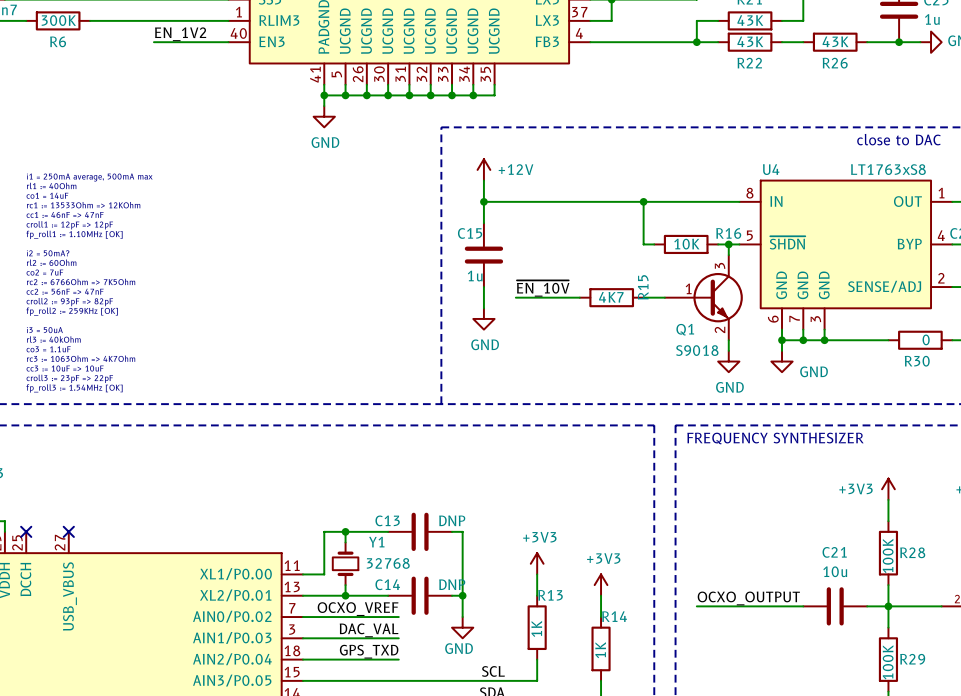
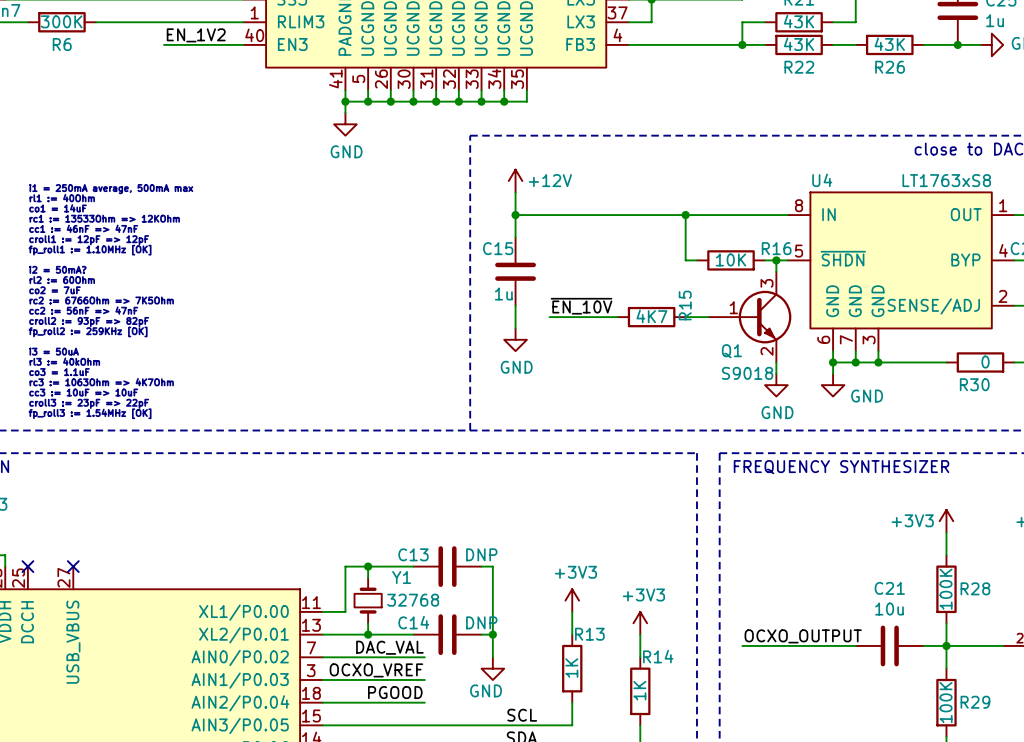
label: OCXO_VREF (358, 609) -> DAC_VAL (389, 647)
label: DAC_VAL (369, 630) -> OCXO_VREF (376, 670)
label: GPS_TXD (369, 651) -> PGOOD (395, 692)

